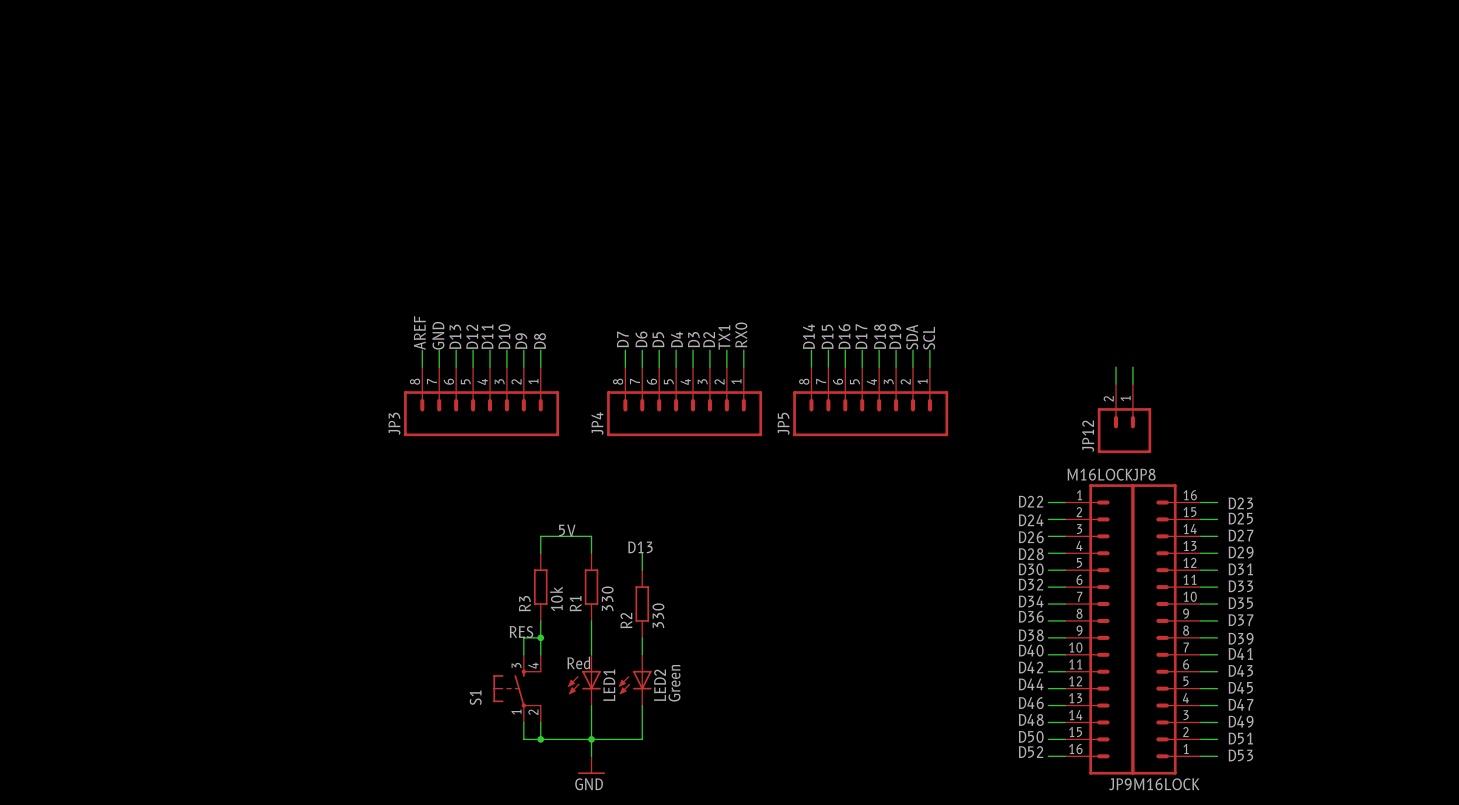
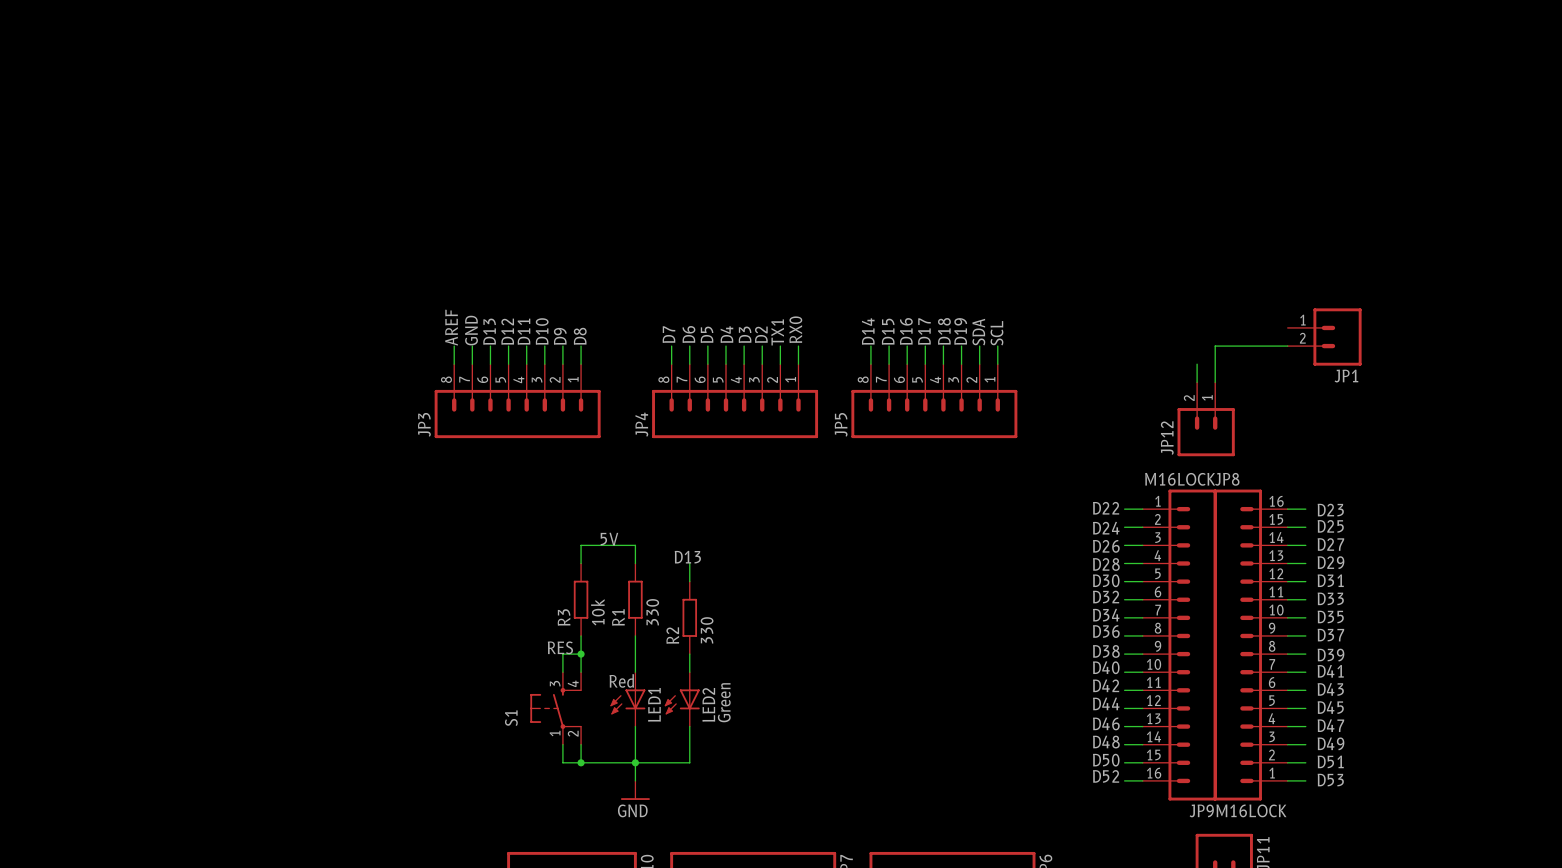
JP1: none -> (1324, 337)
wire: none -> (1287, 346) (1215, 346) (1215, 364)

